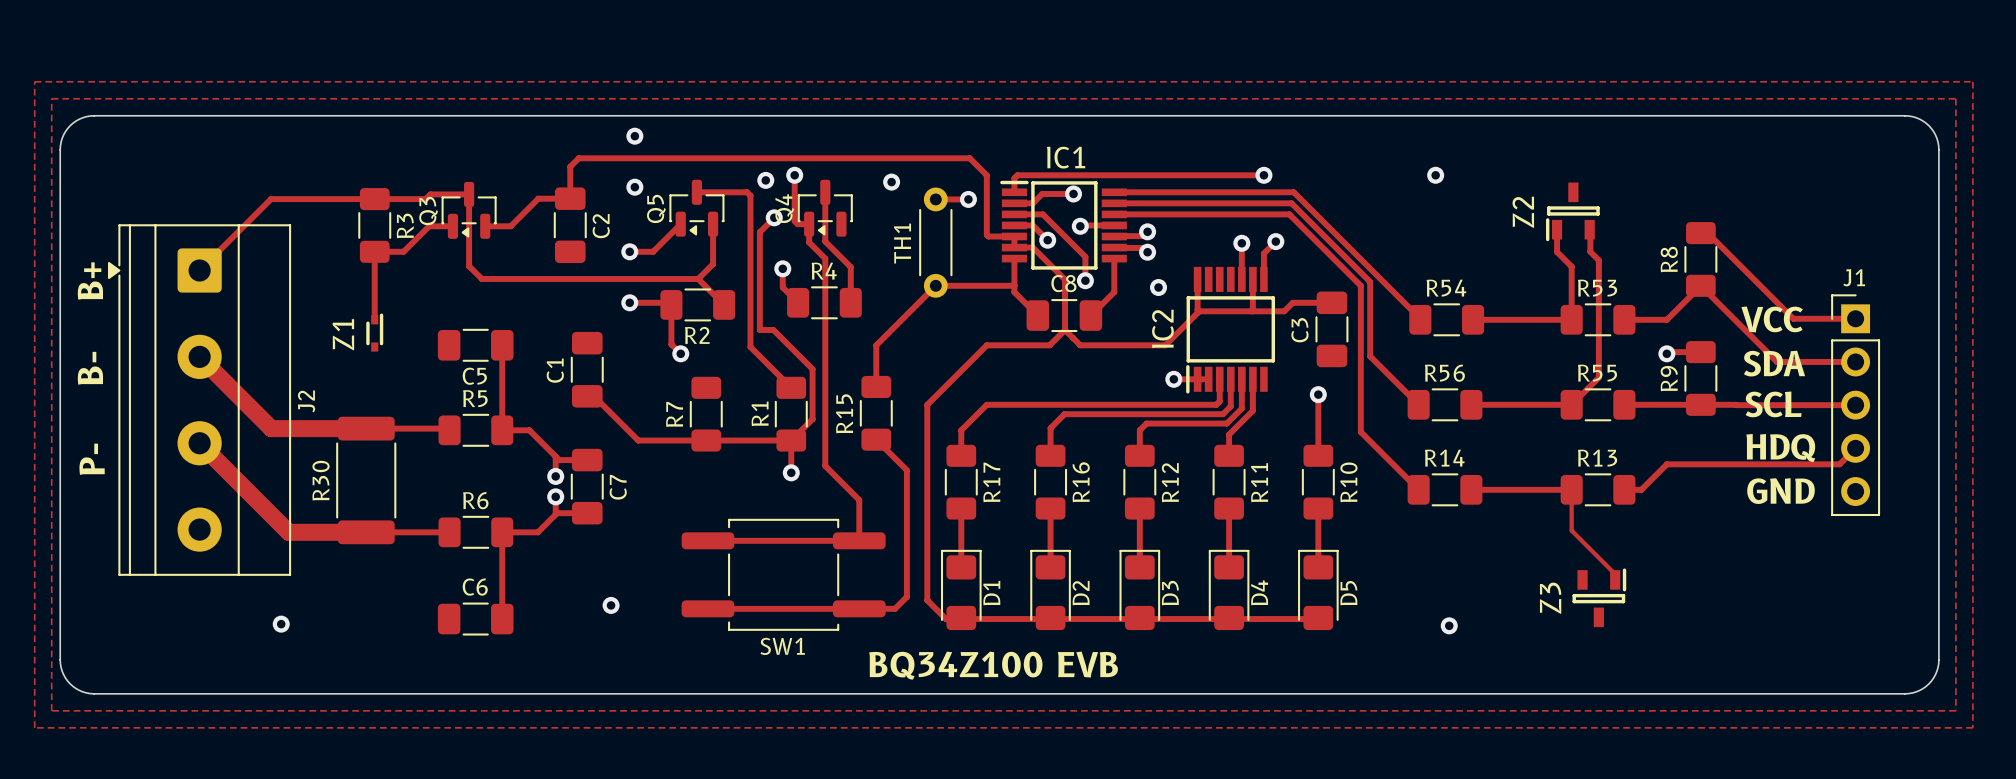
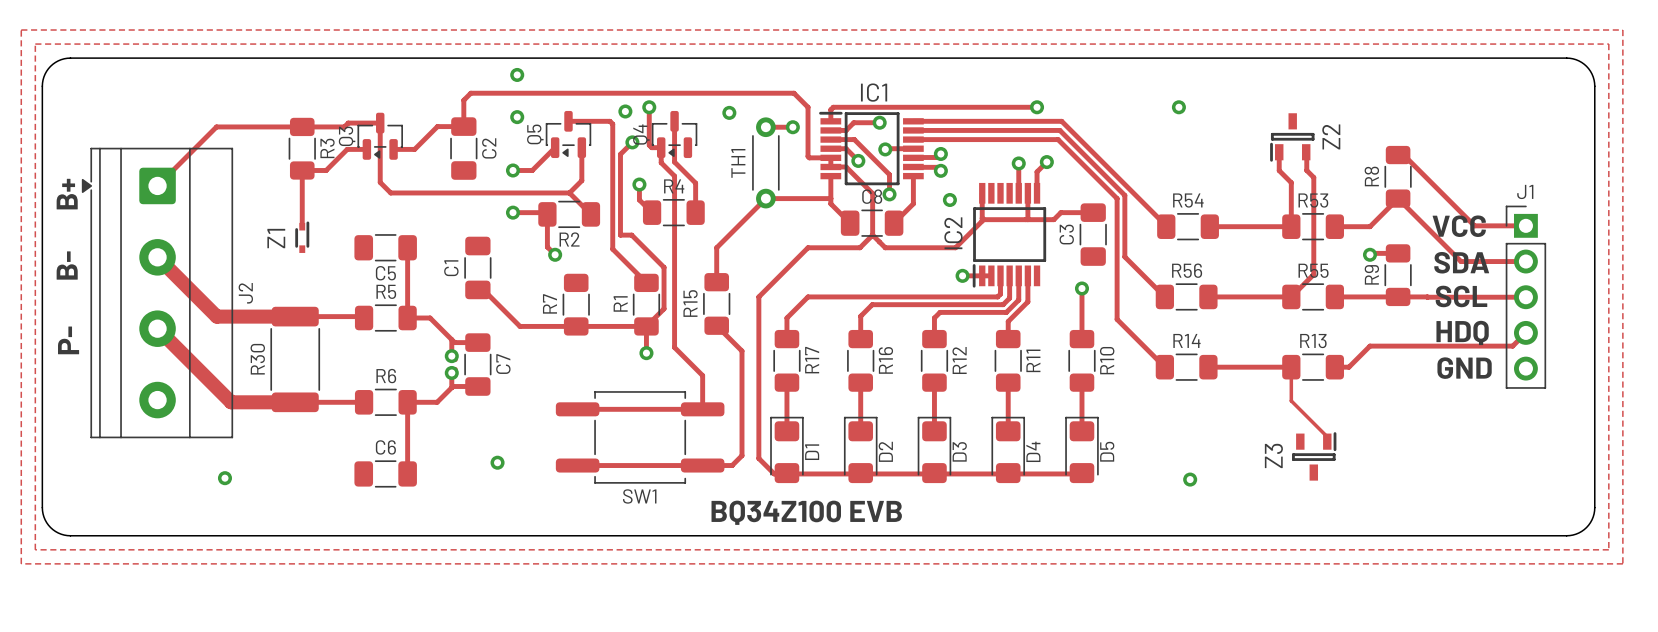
Z2 name position: Z2 (1523, 212) -> Z2 (1331, 136)

